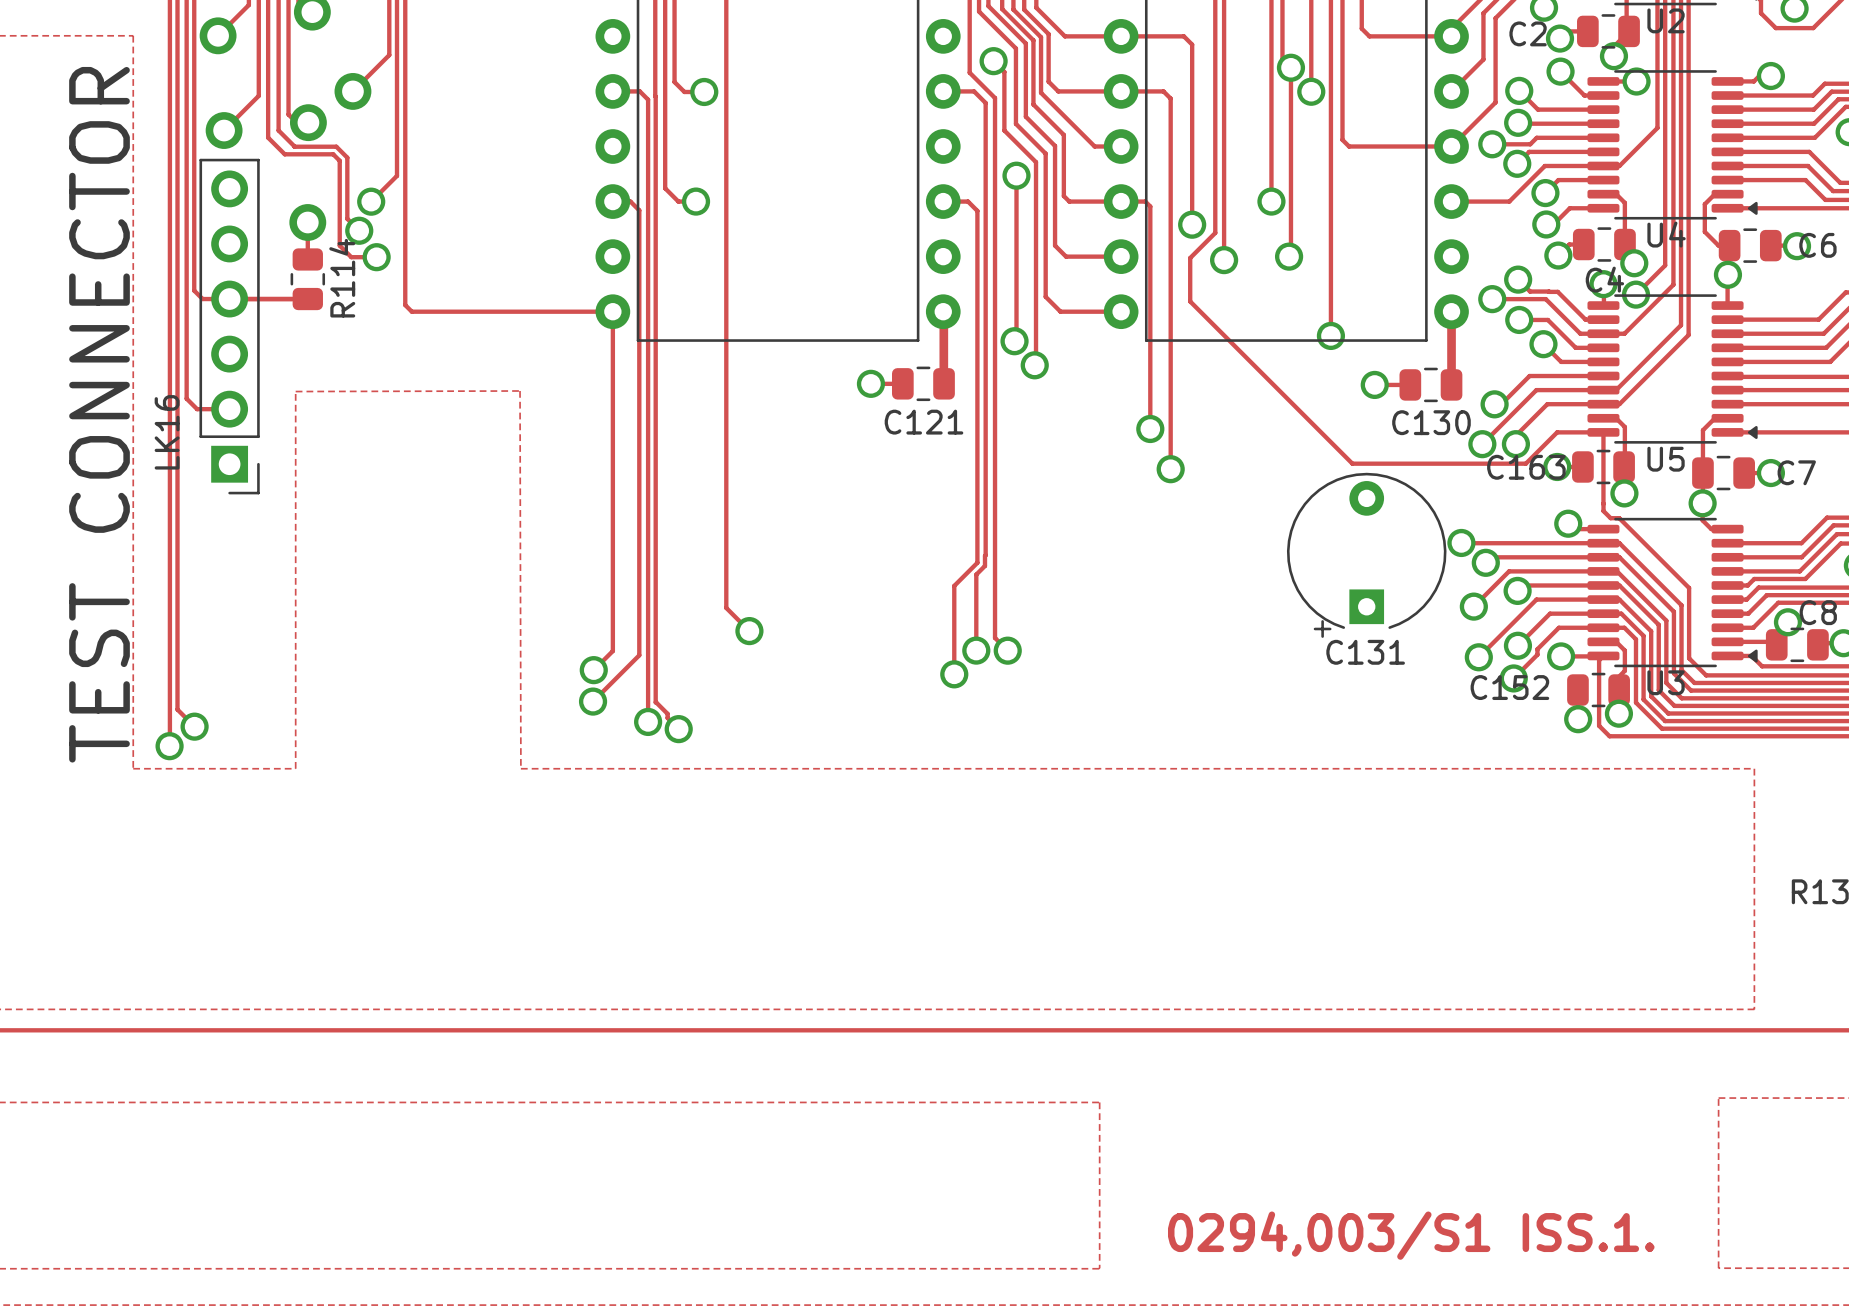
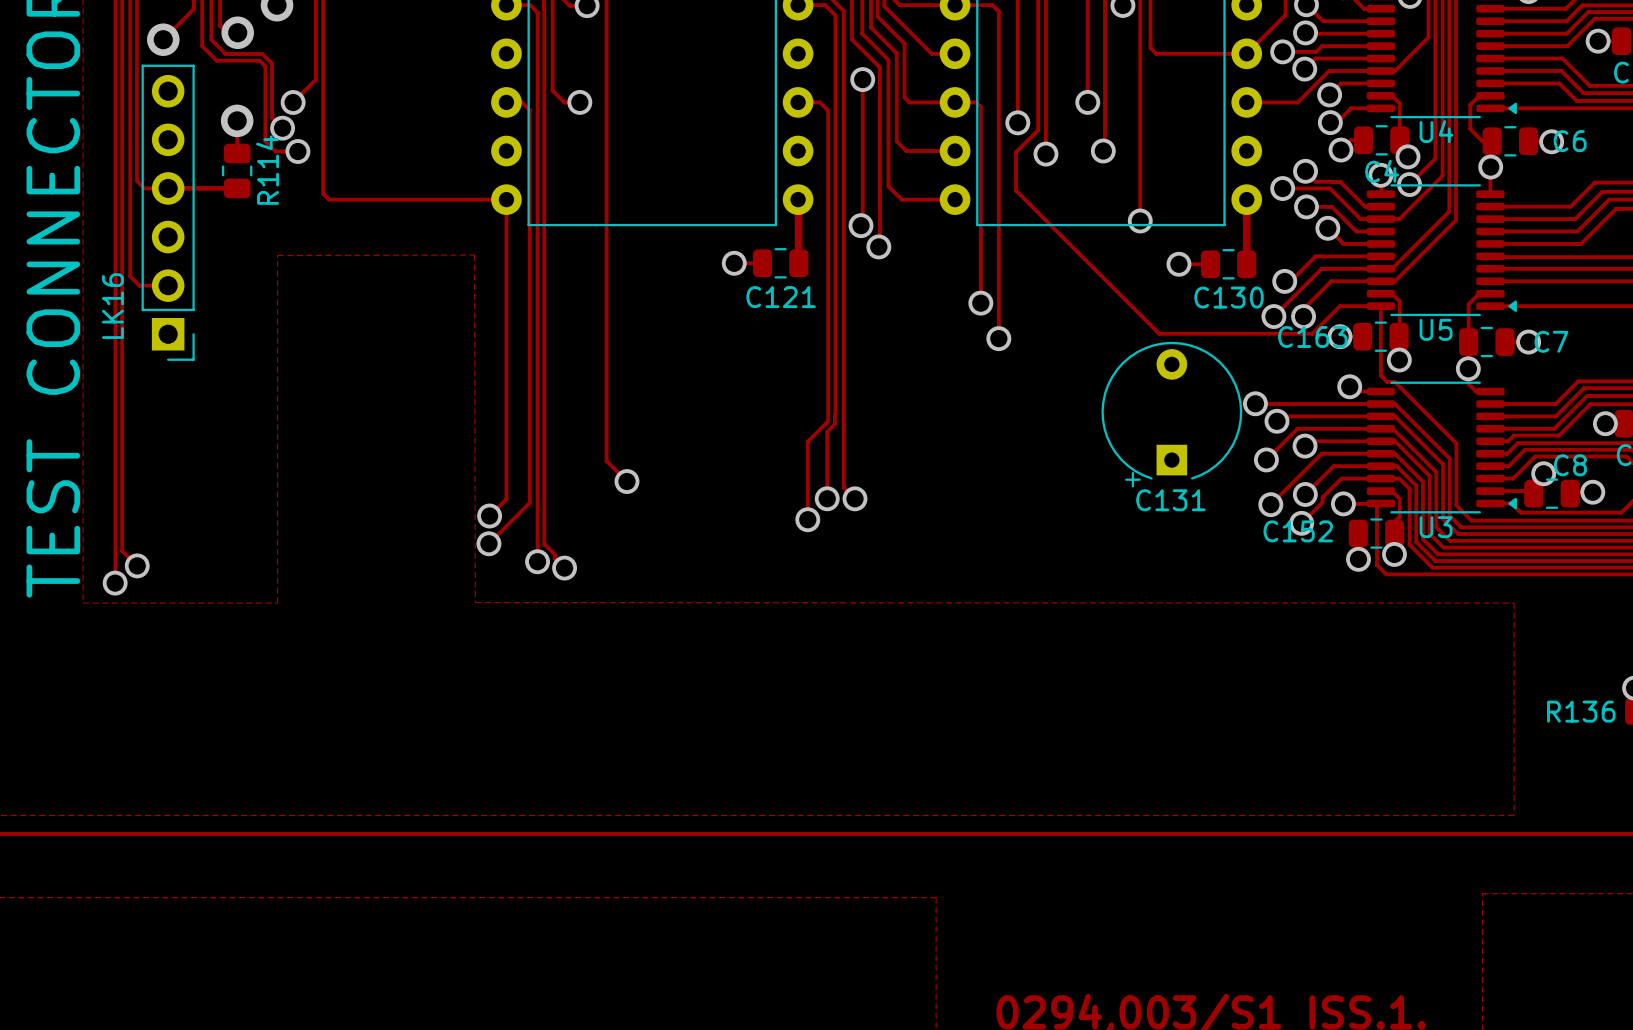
zone outline: (295, 768) (295, 391) (520, 390) (520, 768) (1754, 768) -> (226, 603) (277, 603) (277, 255) (474, 255) (475, 602) (1514, 603)

